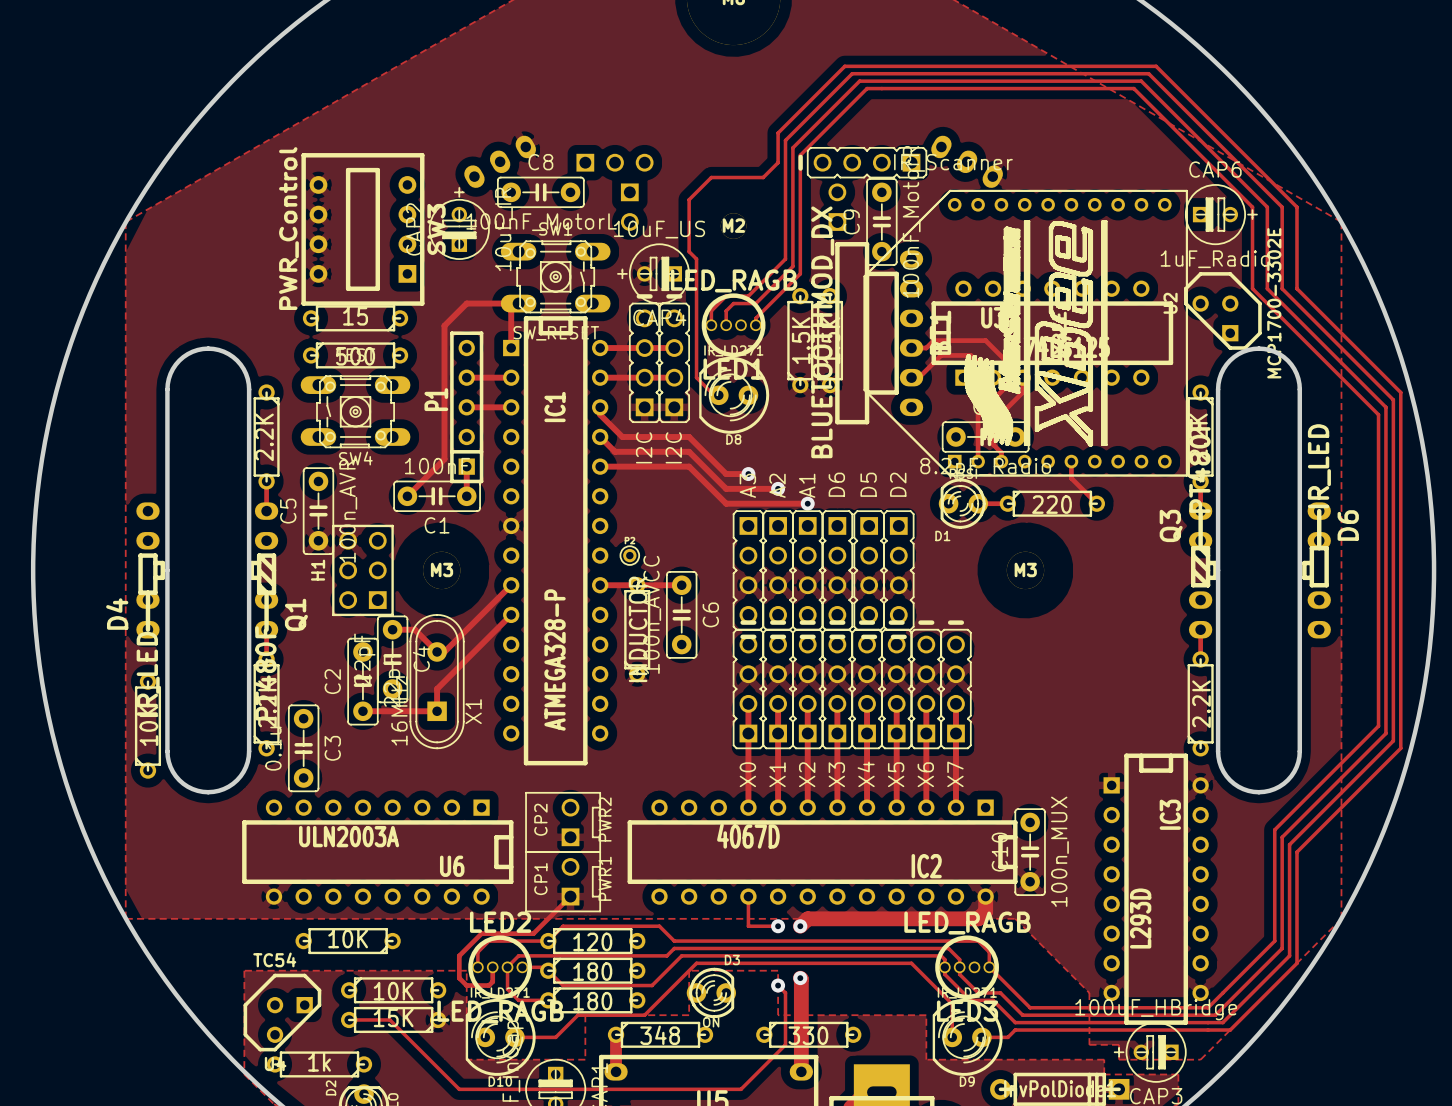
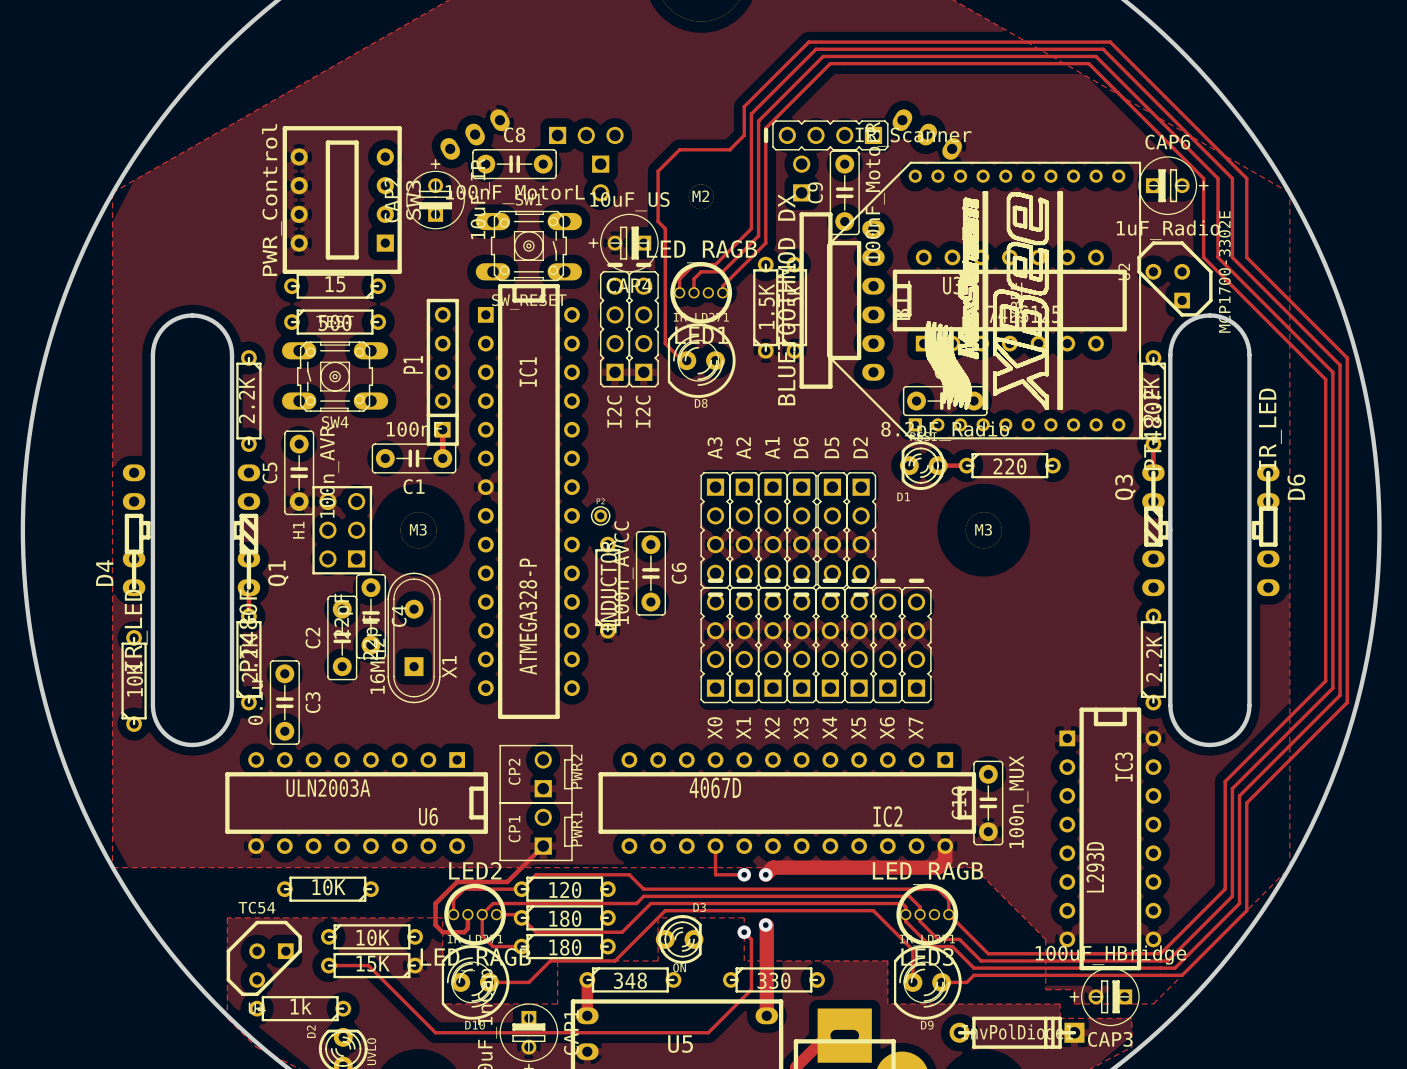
track: (511, 348) (511, 310) (518, 303) (466, 303) (444, 325) (444, 459) (407, 496) -> none
track: (600, 348) (674, 348) -> none
track: (911, 348) (926, 348) (933, 340) (985, 340) (1007, 362) (1007, 385) (978, 414) (978, 461) -> none
track: (466, 377) (511, 377) -> none
track: (600, 377) (674, 377) -> none
track: (911, 377) (918, 377) (941, 355) (970, 355) (993, 377) -> none
track: (1022, 377) (1022, 392) (993, 422) (993, 444) (1001, 452) (1001, 461) -> none
track: (466, 407) (511, 407) -> none
track: (600, 407) (600, 414) (622, 436) (689, 436) (726, 474) (748, 474) -> none
track: (600, 436) (614, 451) (689, 451) (726, 488) (778, 488) -> none
track: (1071, 461) (1071, 478) (1096, 503) -> none
track: (600, 466) (689, 466) (726, 503) (807, 503) -> none
via: (748, 474) -> none
track: (266, 481) (266, 511) -> none
via: (778, 488) -> none
via: (807, 503) -> none
track: (511, 585) (444, 651) (437, 651) (414, 629) (392, 629) -> none
track: (600, 585) (681, 585) -> none
track: (511, 614) (437, 689) (437, 711) (362, 711) -> none
track: (1200, 629) (1200, 659) -> none
track: (748, 703) (748, 807) -> none
track: (778, 703) (778, 807) -> none
track: (807, 703) (807, 807) -> none
track: (837, 703) (837, 807) -> none
track: (867, 703) (867, 807) -> none
track: (896, 703) (896, 807) -> none
track: (926, 703) (926, 807) -> none
track: (955, 703) (955, 807) -> none

